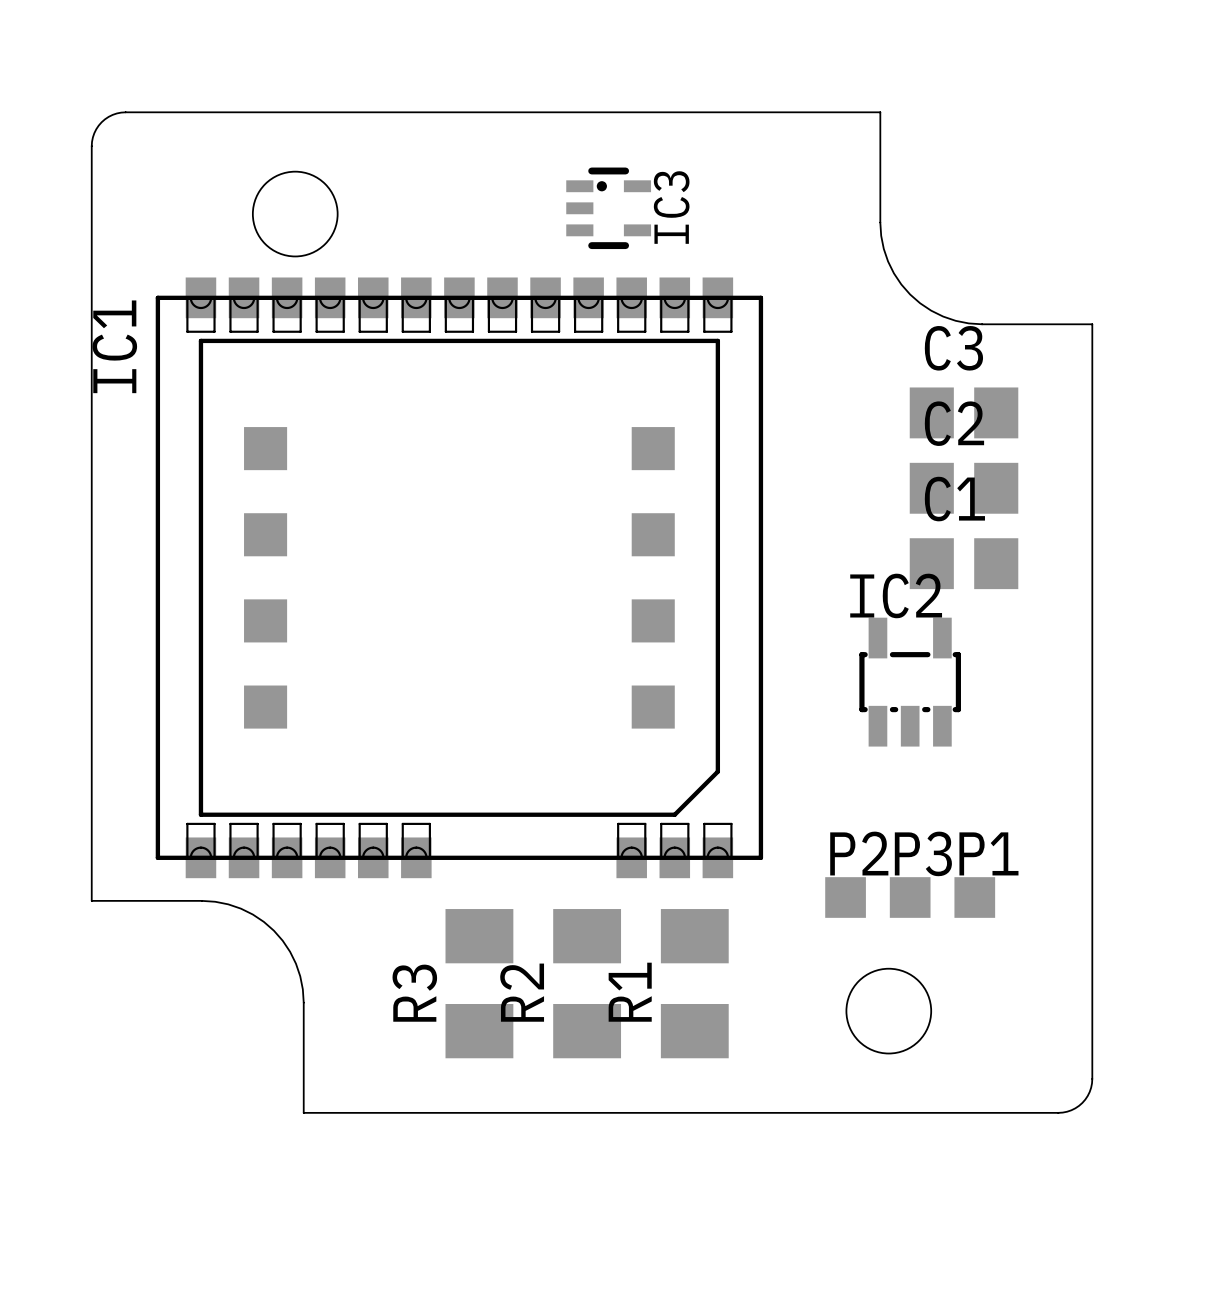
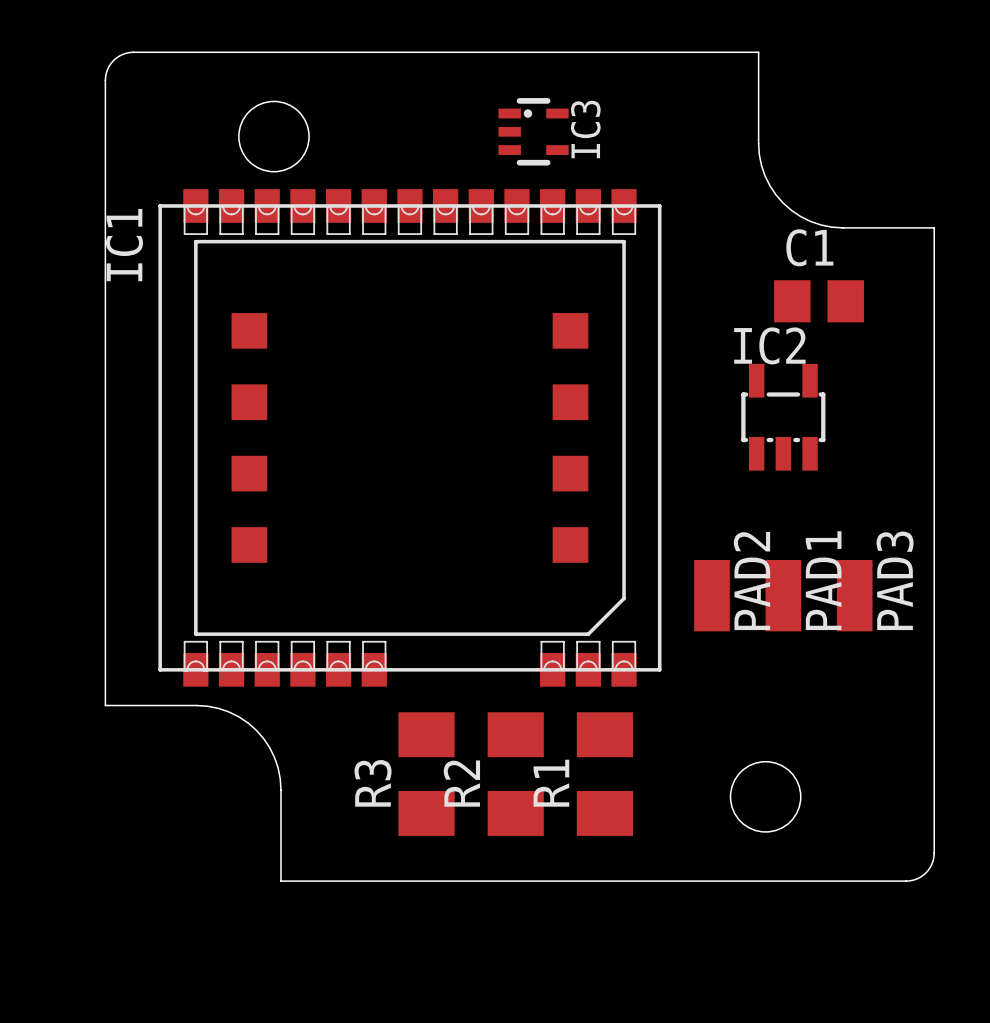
C3: (964, 412) -> none
C2: (964, 488) -> none
C1 position: (964, 563) -> (819, 301)
IC2 position: (910, 682) -> (783, 417)
PAD2: none -> (711, 595)
PAD1: none -> (783, 595)
PAD3: none -> (854, 595)
P2: (845, 897) -> none
P3: (910, 897) -> none
P1: (974, 897) -> none

